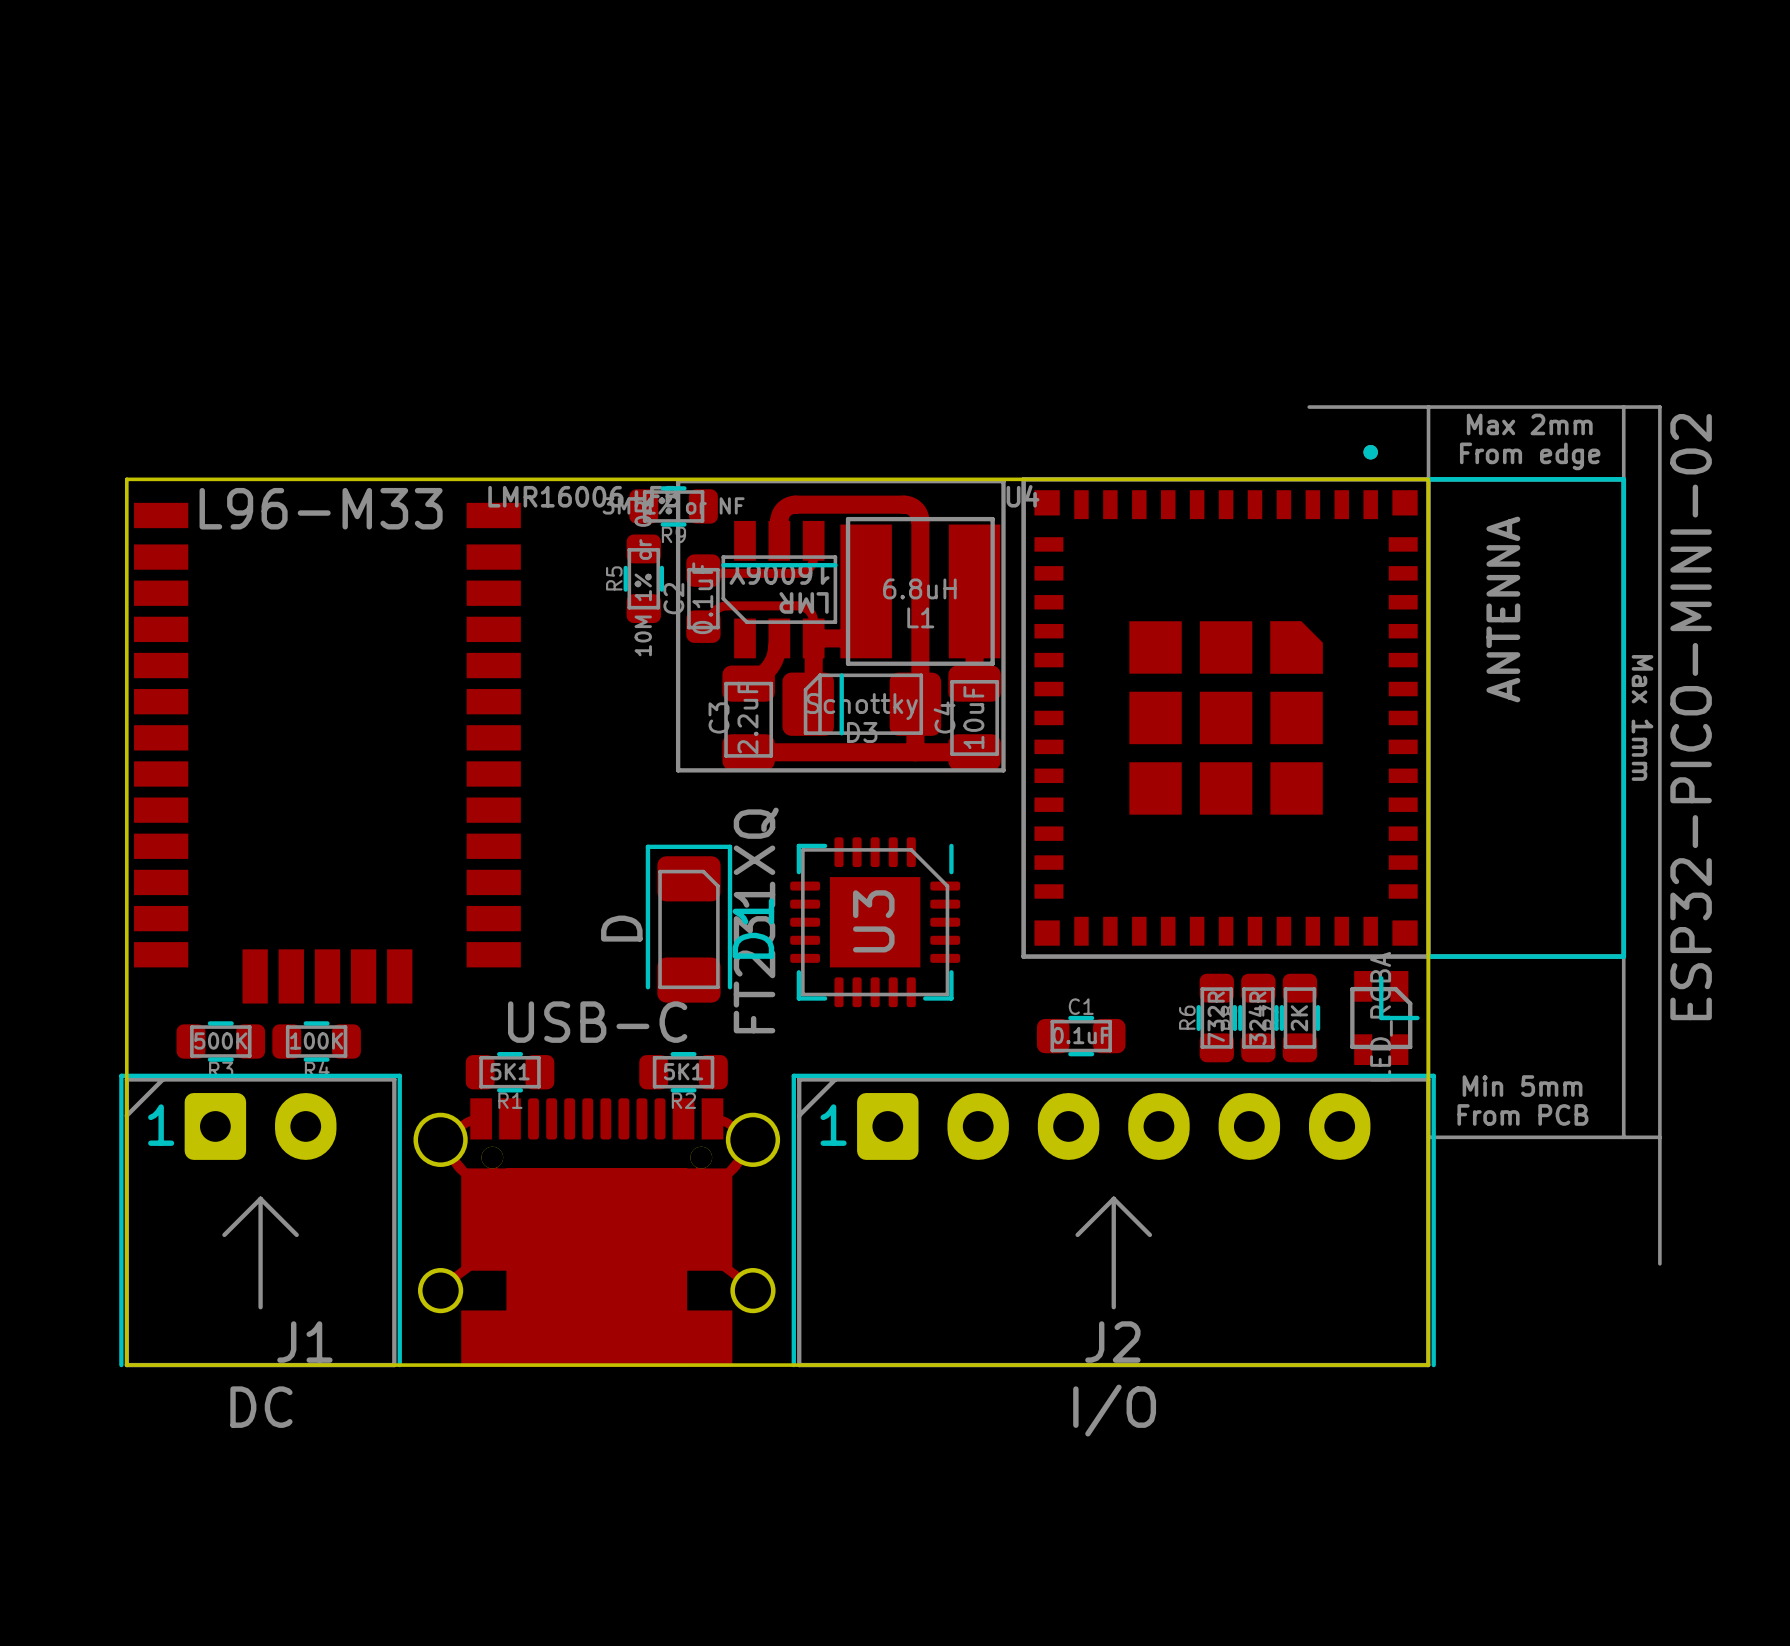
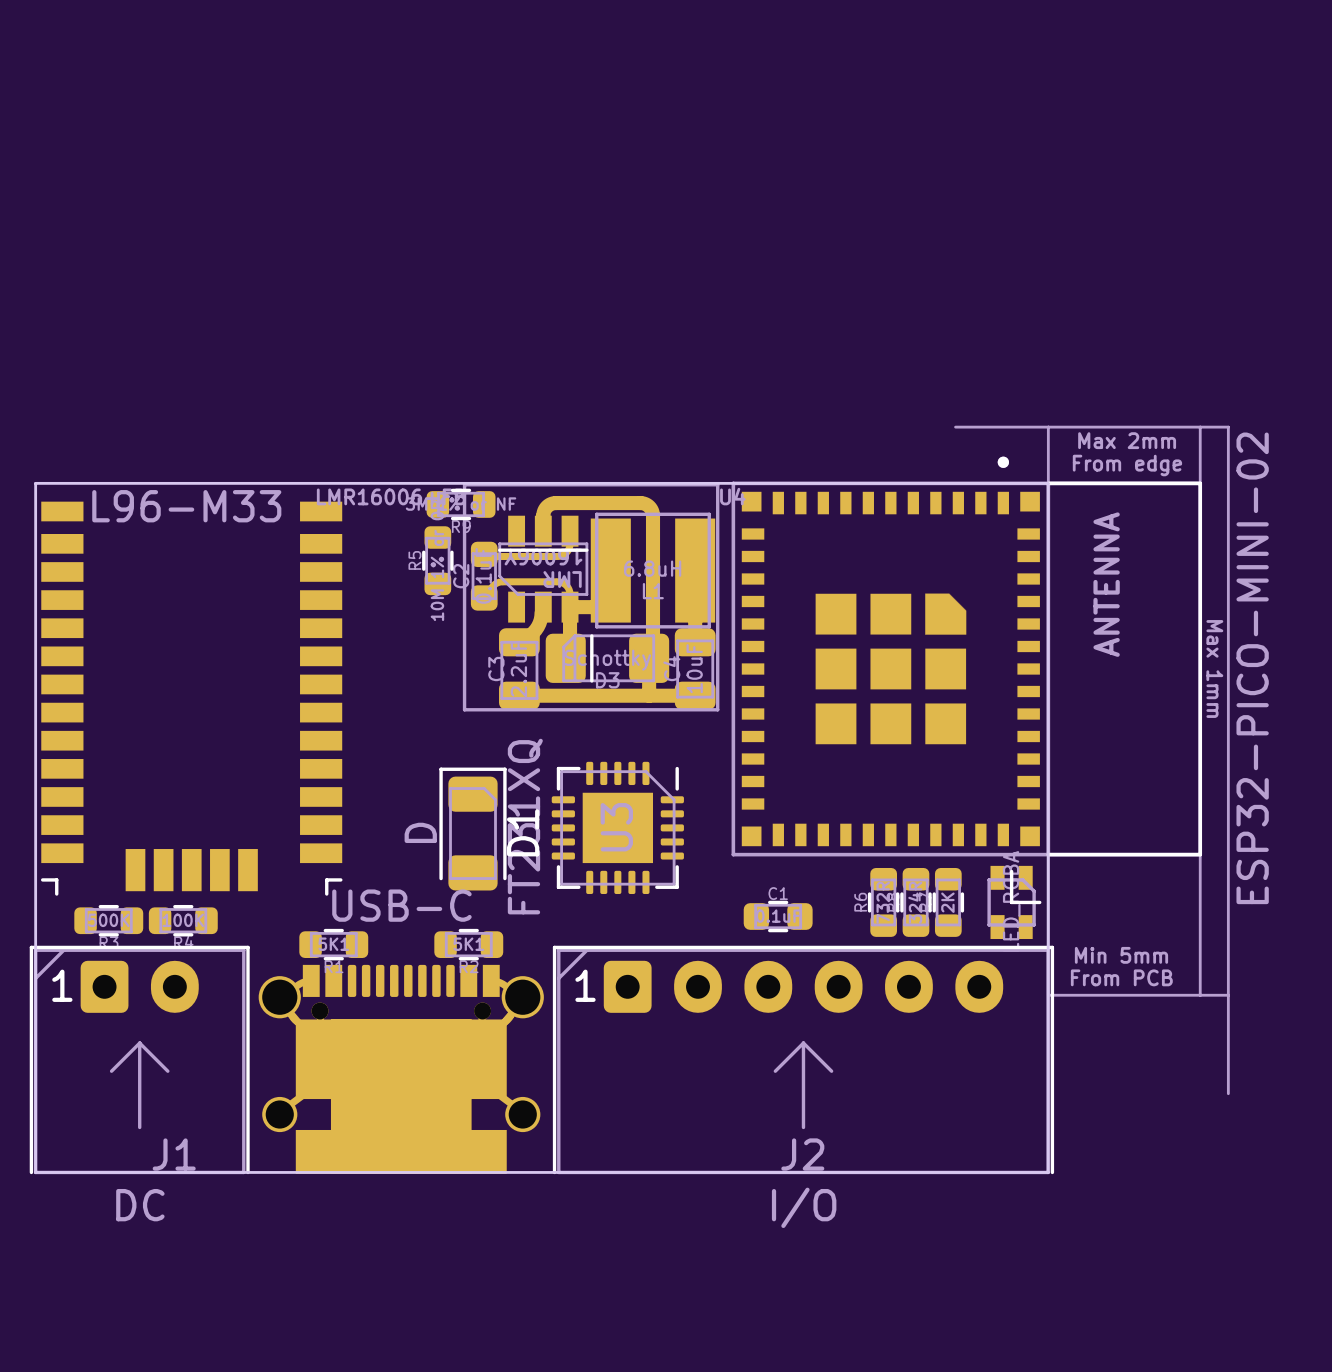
part footprint: [134, 502, 521, 1004] -> [40, 501, 343, 896]

